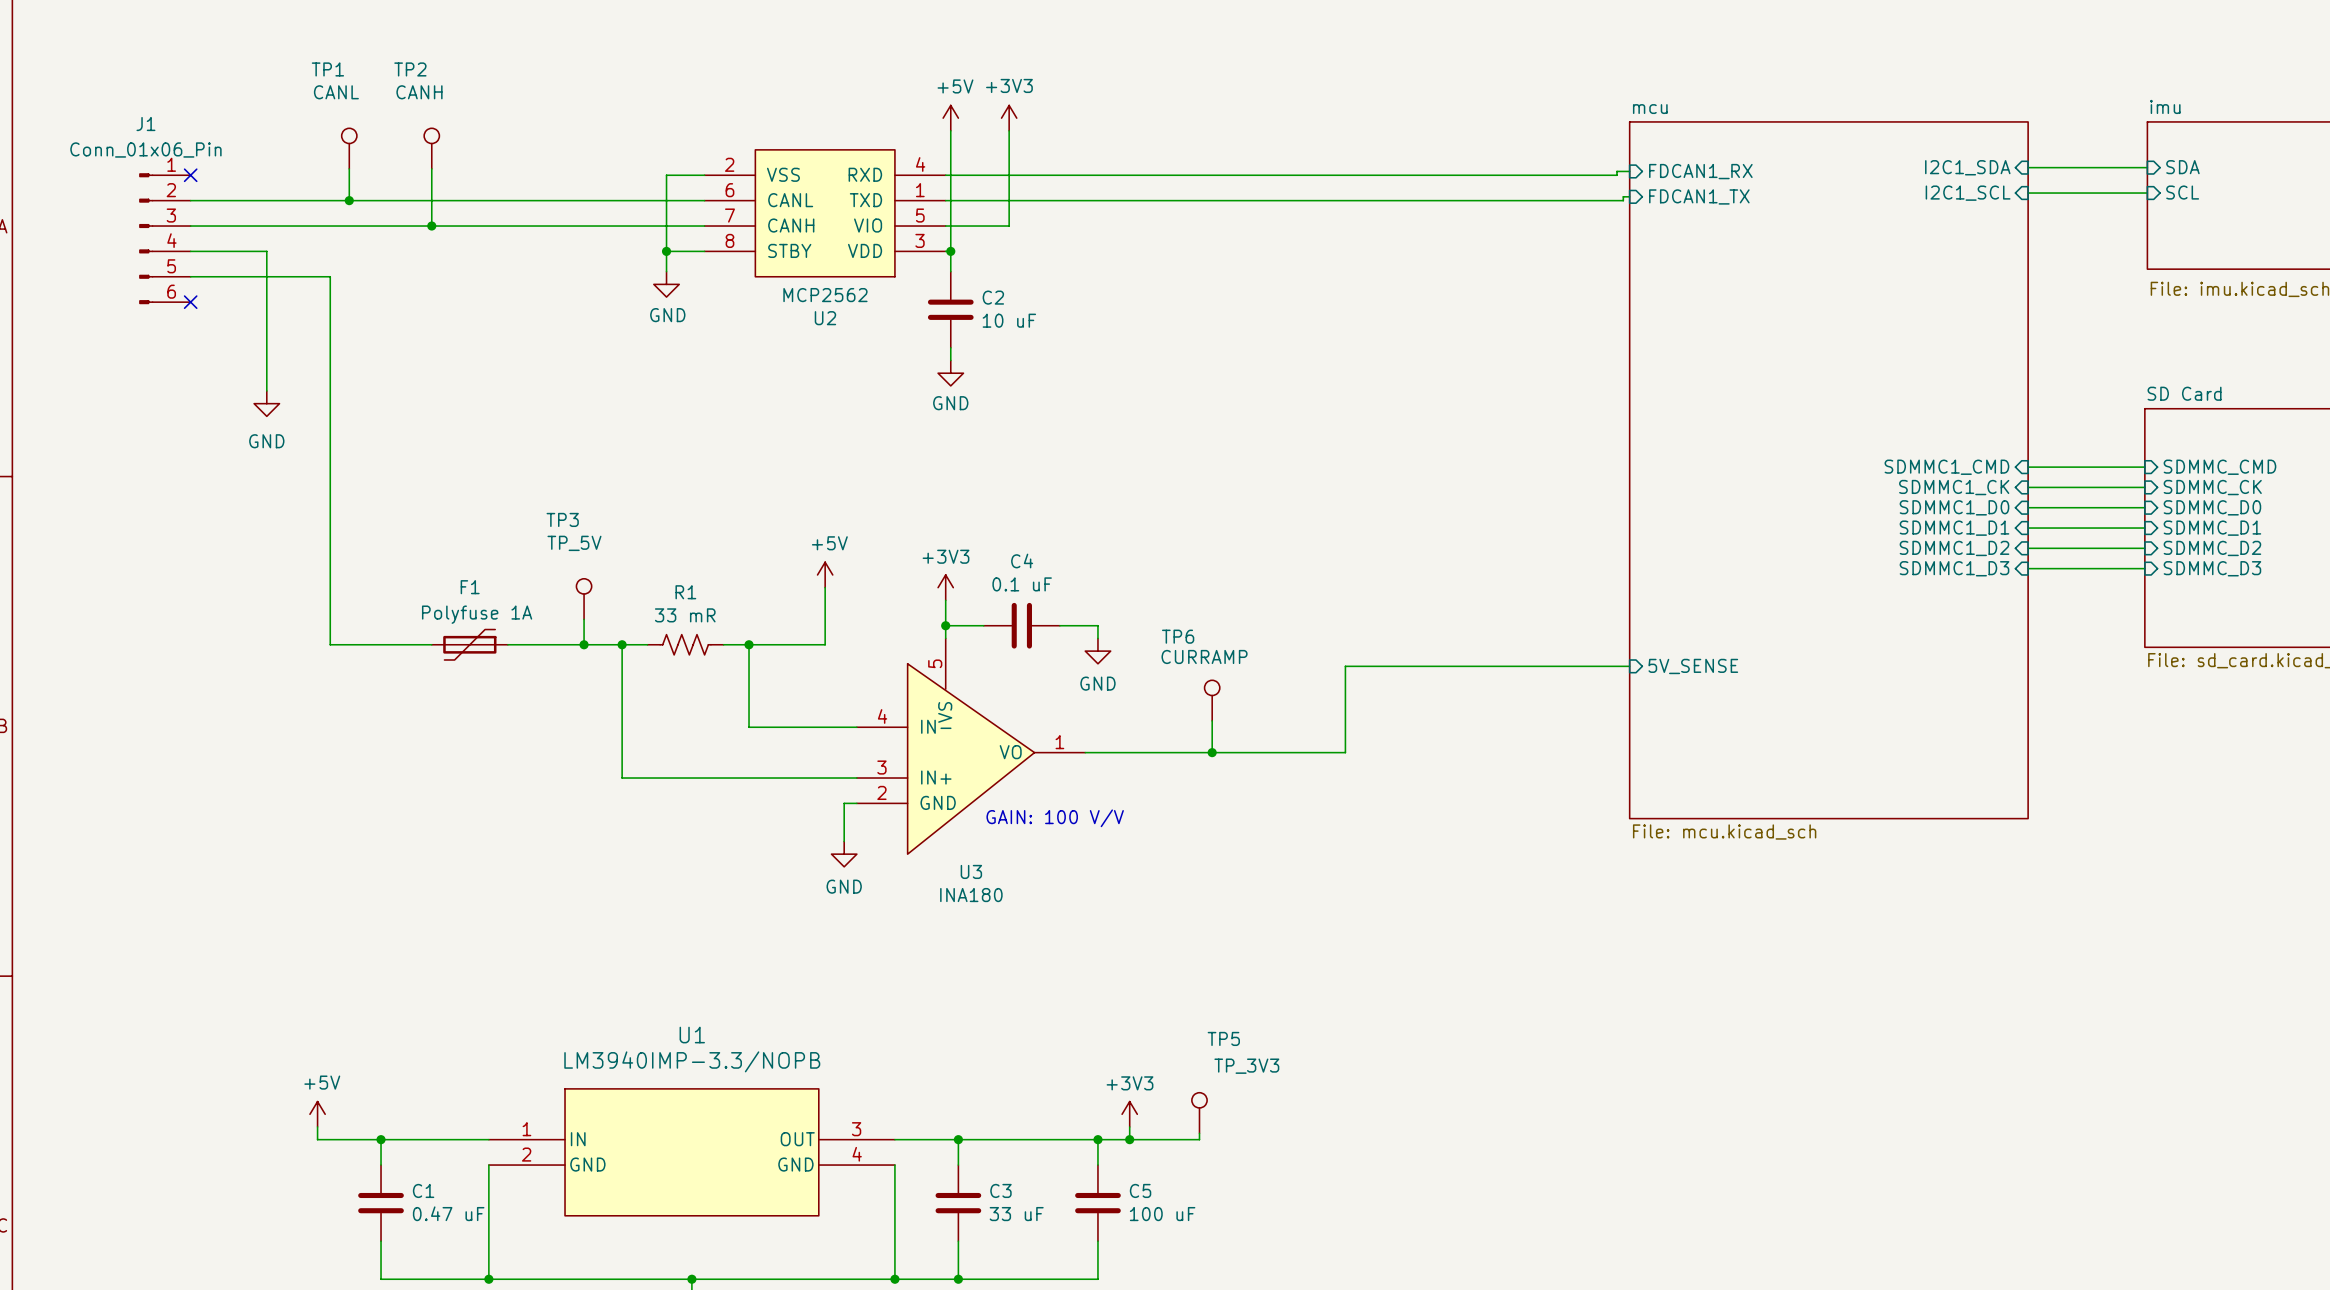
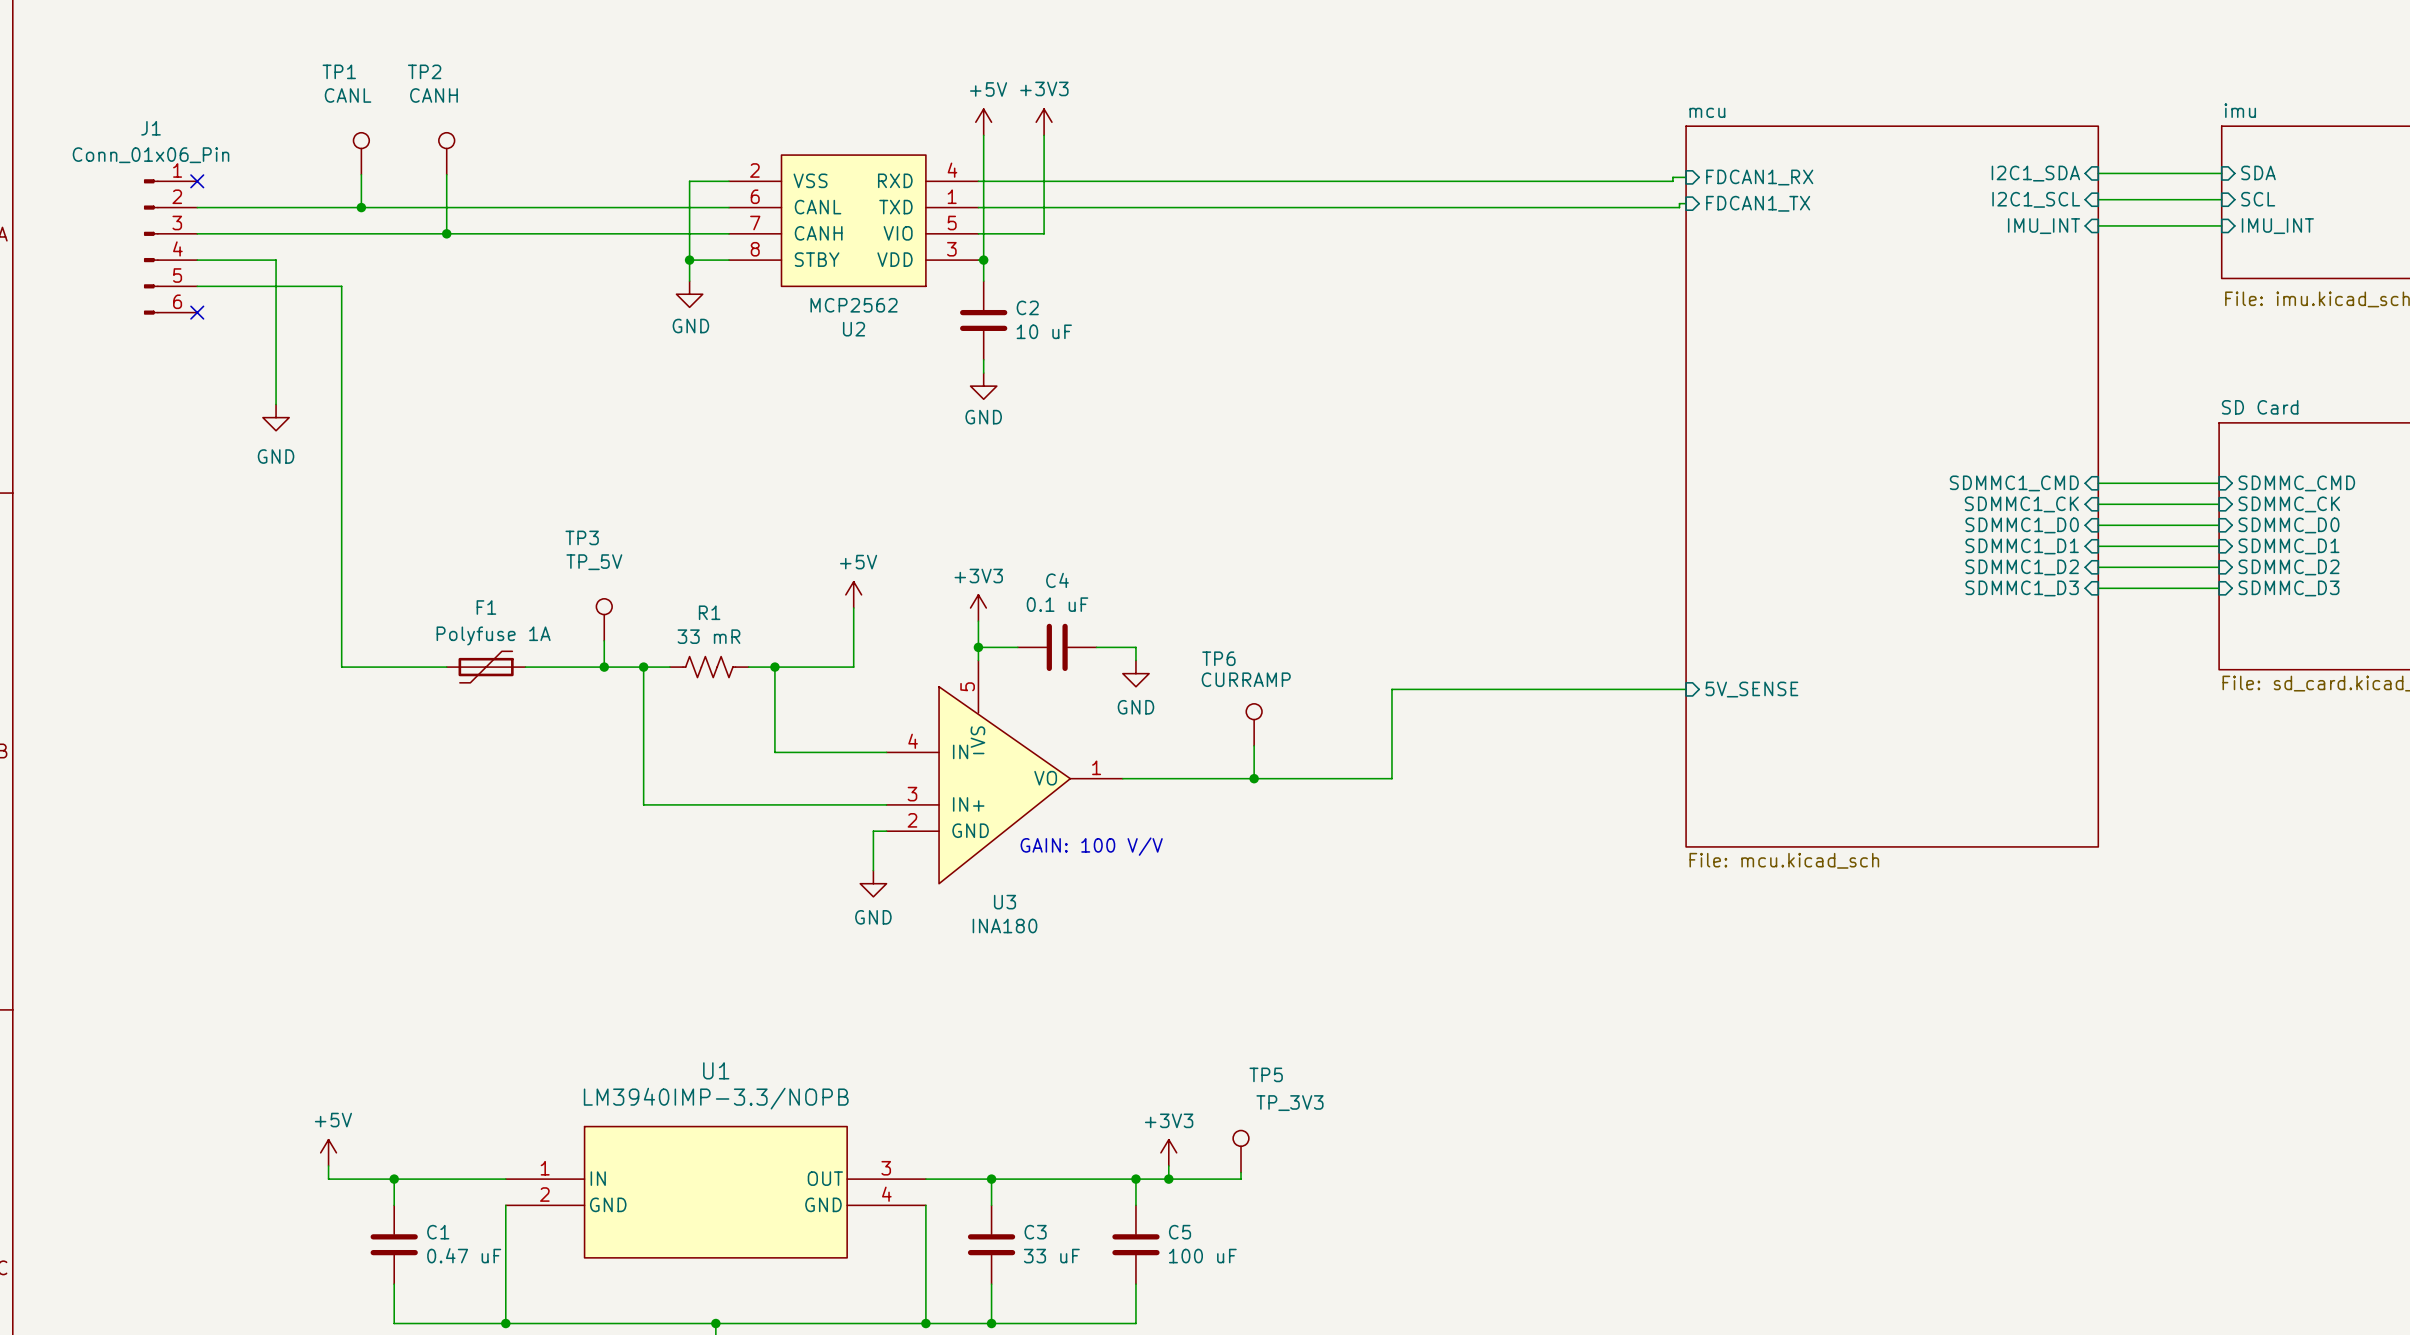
sheet pin: none -> IMU_INT (2044, 226)
wire: none -> (2098, 225) (2221, 225)
sheet pin: none -> IMU_INT (2277, 226)

